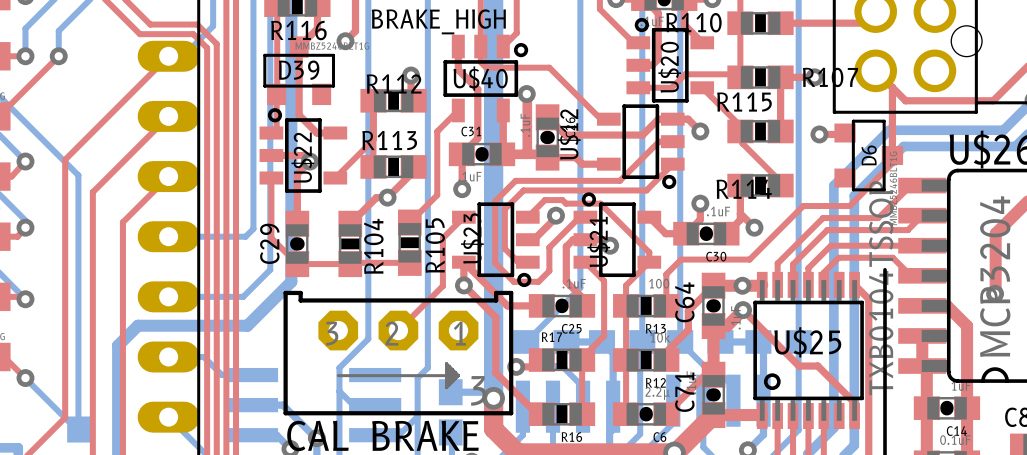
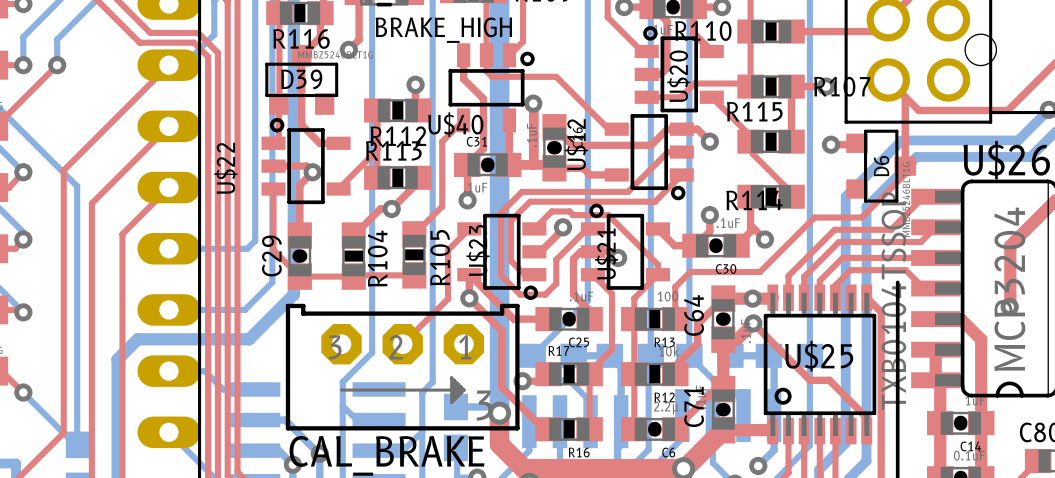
U$40 name position: U$40 (480, 78) -> U$40 (455, 124)
R112 name position: R112 (394, 83) -> R112 (398, 136)
U$22 name position: U$22 (302, 157) -> U$22 (225, 168)

